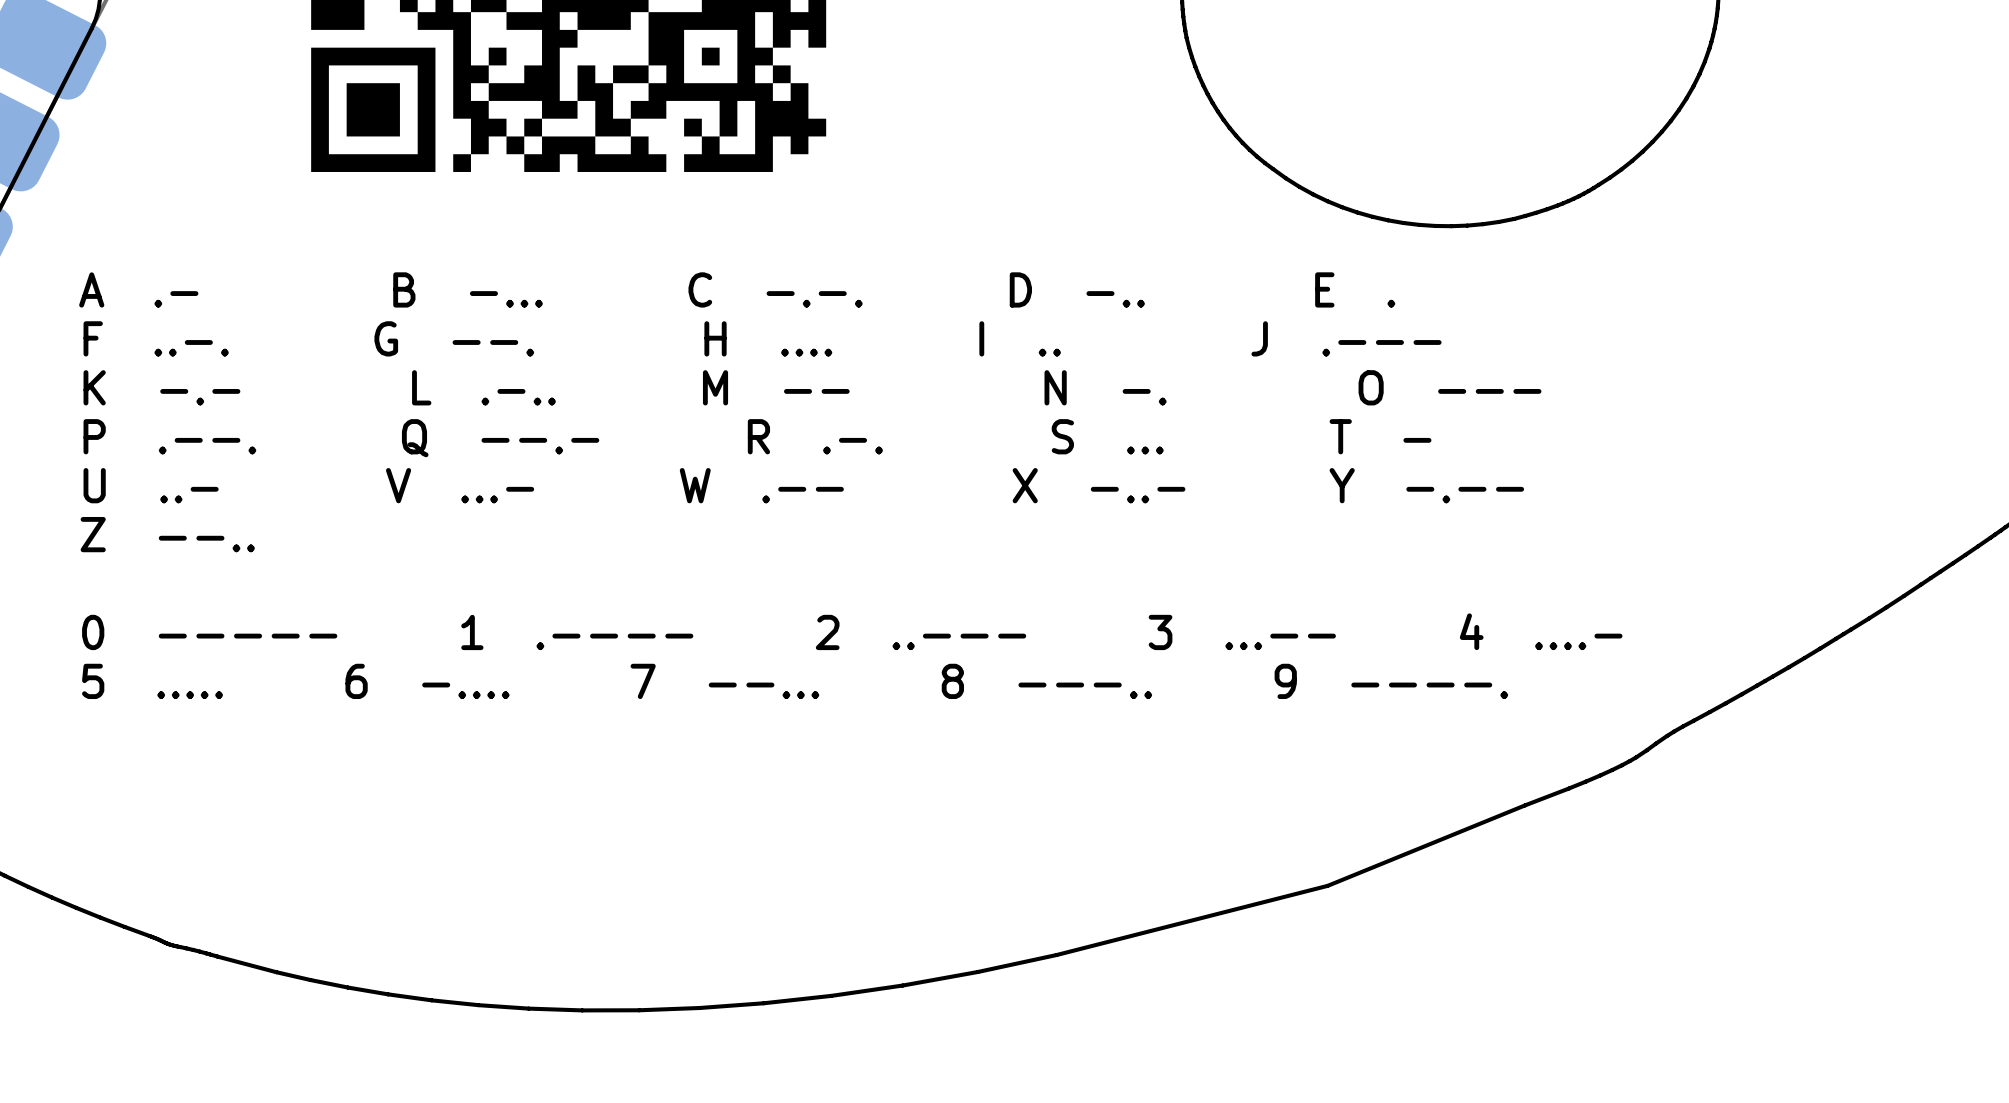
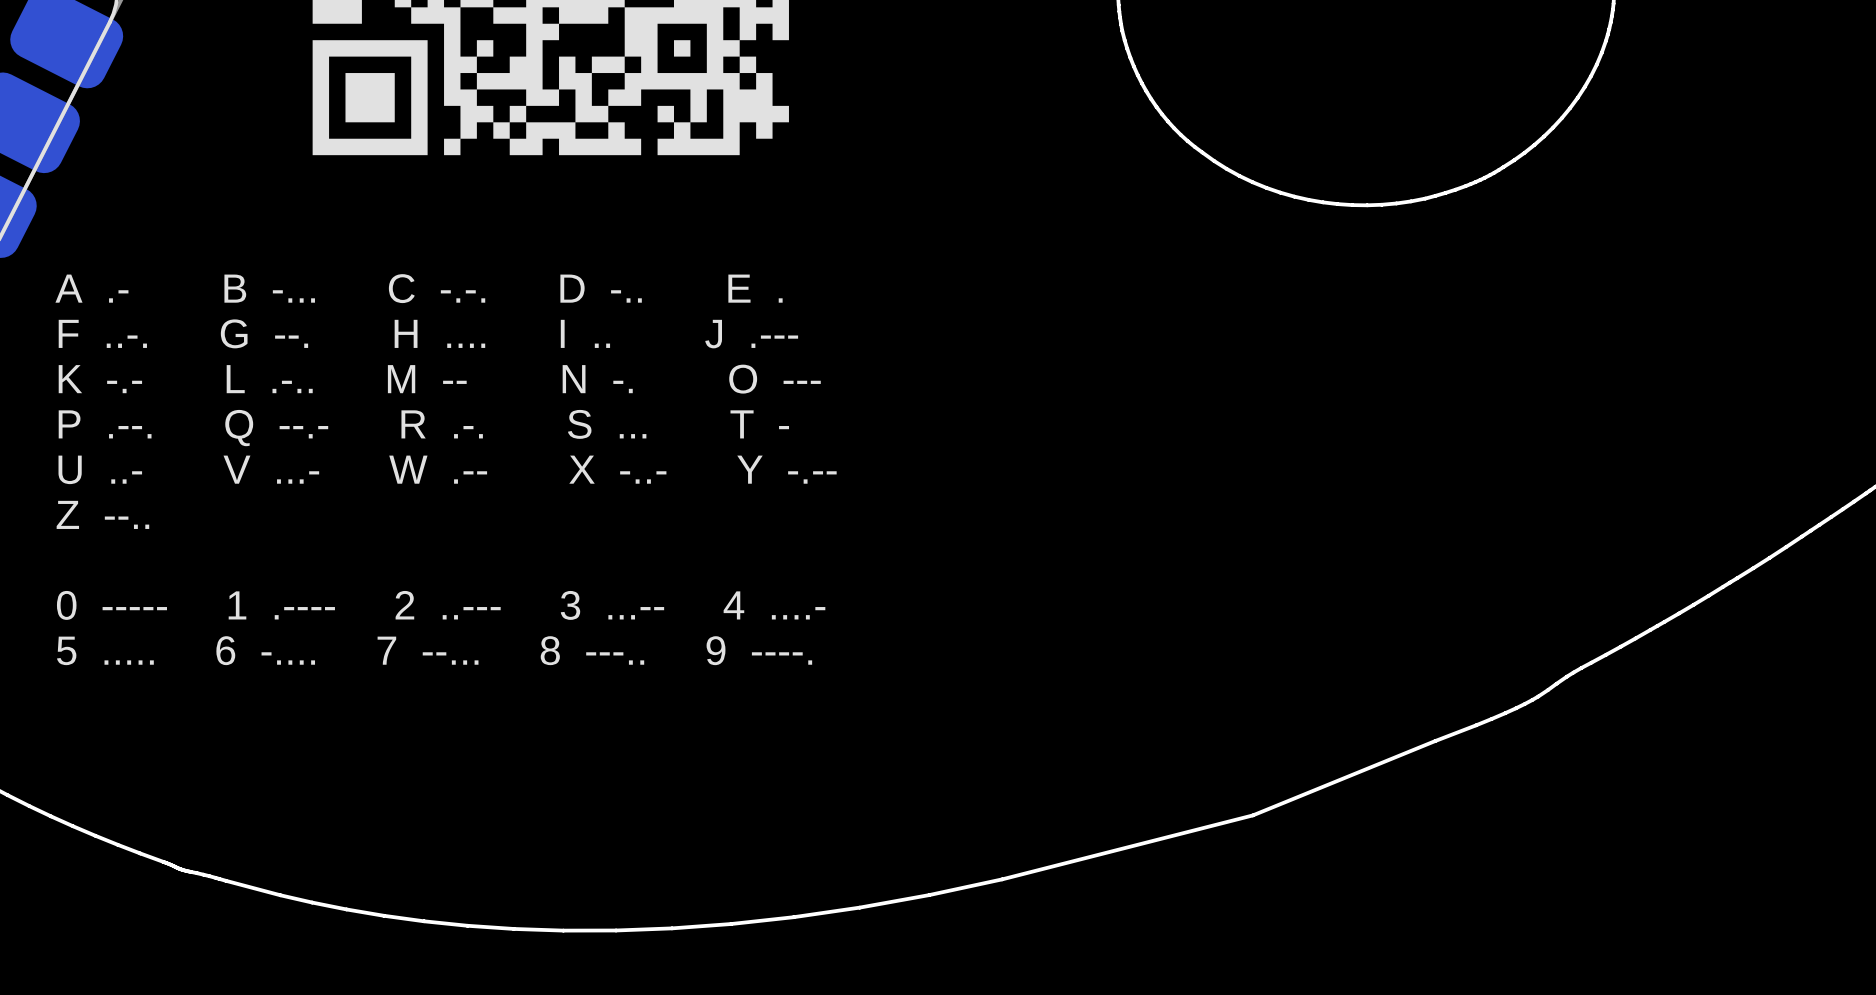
text position: A .- B -... C -.-. D -.. E . (737, 289) -> A .- B -... C -.-. D -.. E . (419, 288)
text position: F ..-. G --. H .... I .. J .--- (762, 338) -> F ..-. G --. H .... I .. J .--- (428, 333)
text position: K -.- L .-.. M -- N -. O --- (812, 387) -> K -.- L .-.. M -- N -. O --- (439, 379)
text position: P .--. Q --.- R .-. S ... T - (757, 438) -> P .--. Q --.- R .-. S ... T - (423, 428)
text position: U ..- V ...- W .-- X -..- Y -.-- (803, 485) -> U ..- V ...- W .-- X -..- Y -.-- (447, 469)
text position: Z --.. (167, 534) -> Z --.. (102, 514)
text position: 0 ----- 1 .---- 2 ..--- 3 ...-- 4 ....- (852, 631) -> 0 ----- 1 .---- 2 ..--- 3 ...-- 4 ....- (441, 605)
text position: 5 ..... 6 -.... 7 --... 8 ---.. 9 ----. (795, 681) -> 5 ..... 6 -.... 7 --... 8 ---.. 9 ----. (434, 650)

